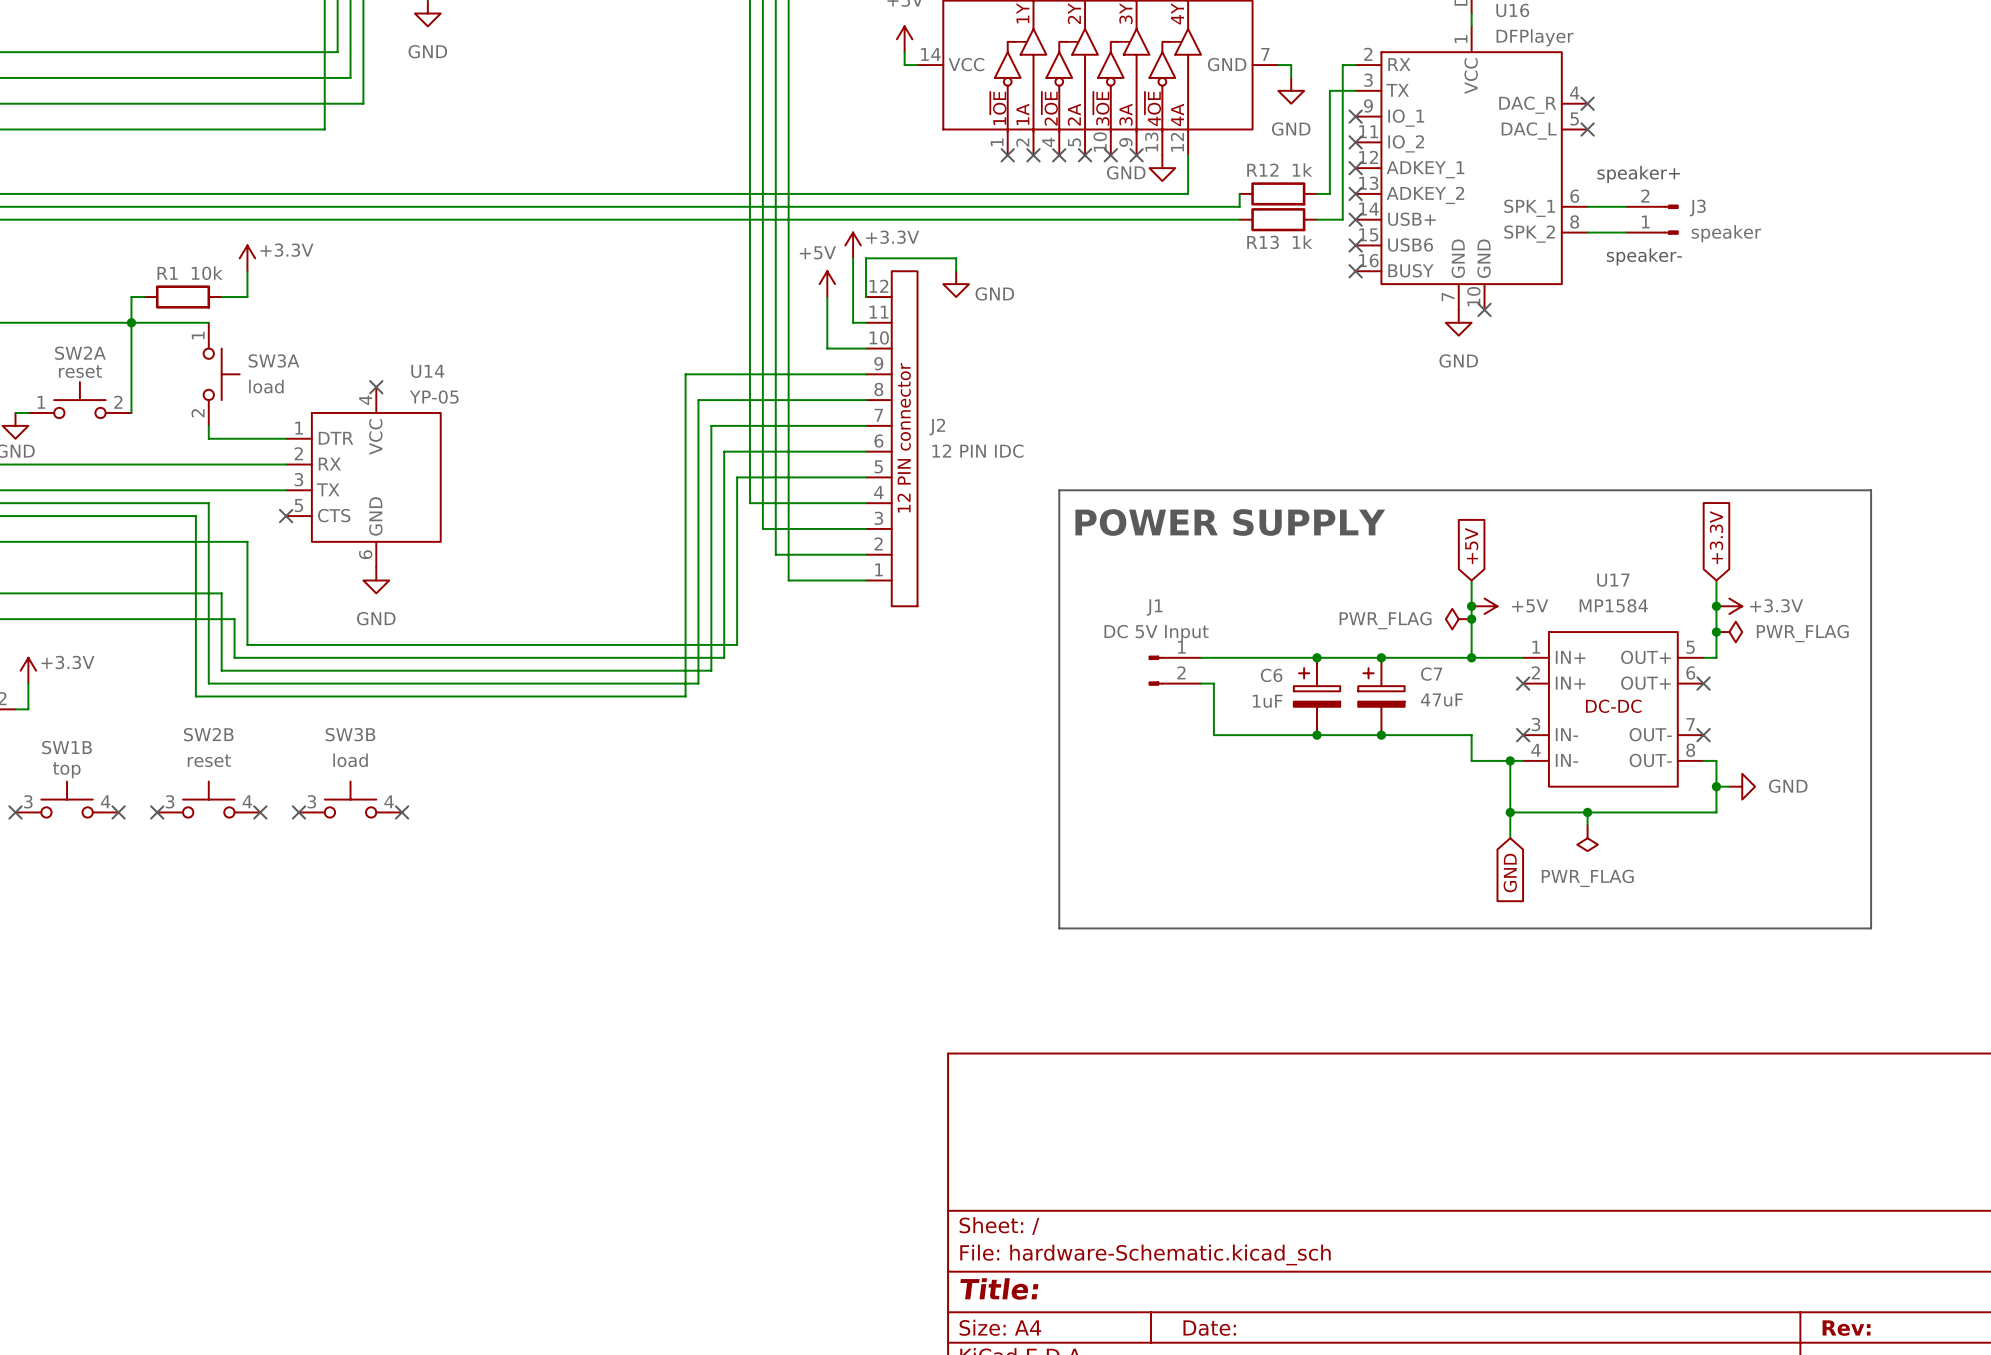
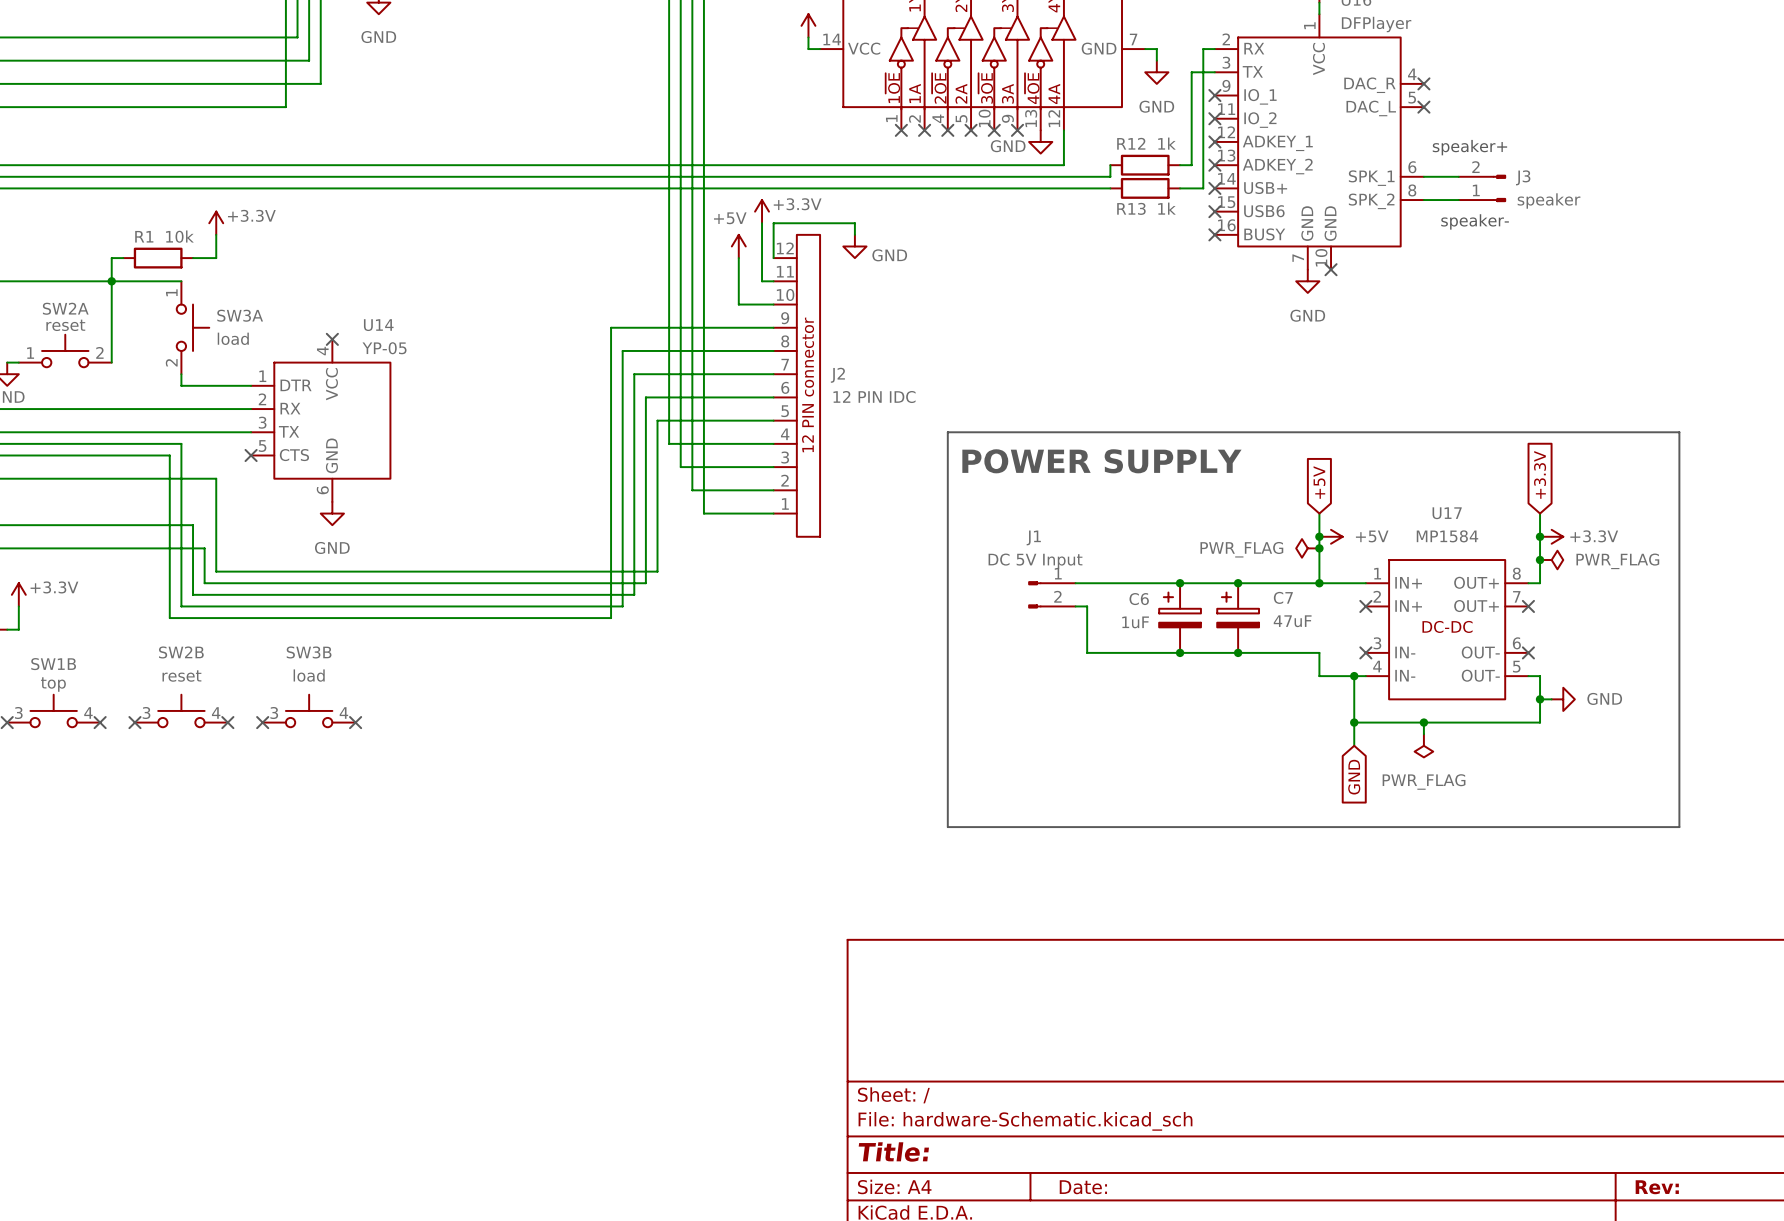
U17 pin number: 5 (1690, 647) -> 8 (1516, 573)
U17 pin number: 6 (1690, 672) -> 7 (1516, 596)
U17 pin number: 7 (1690, 724) -> 6 (1516, 643)
U17 pin number: 8 (1690, 750) -> 5 (1516, 666)

